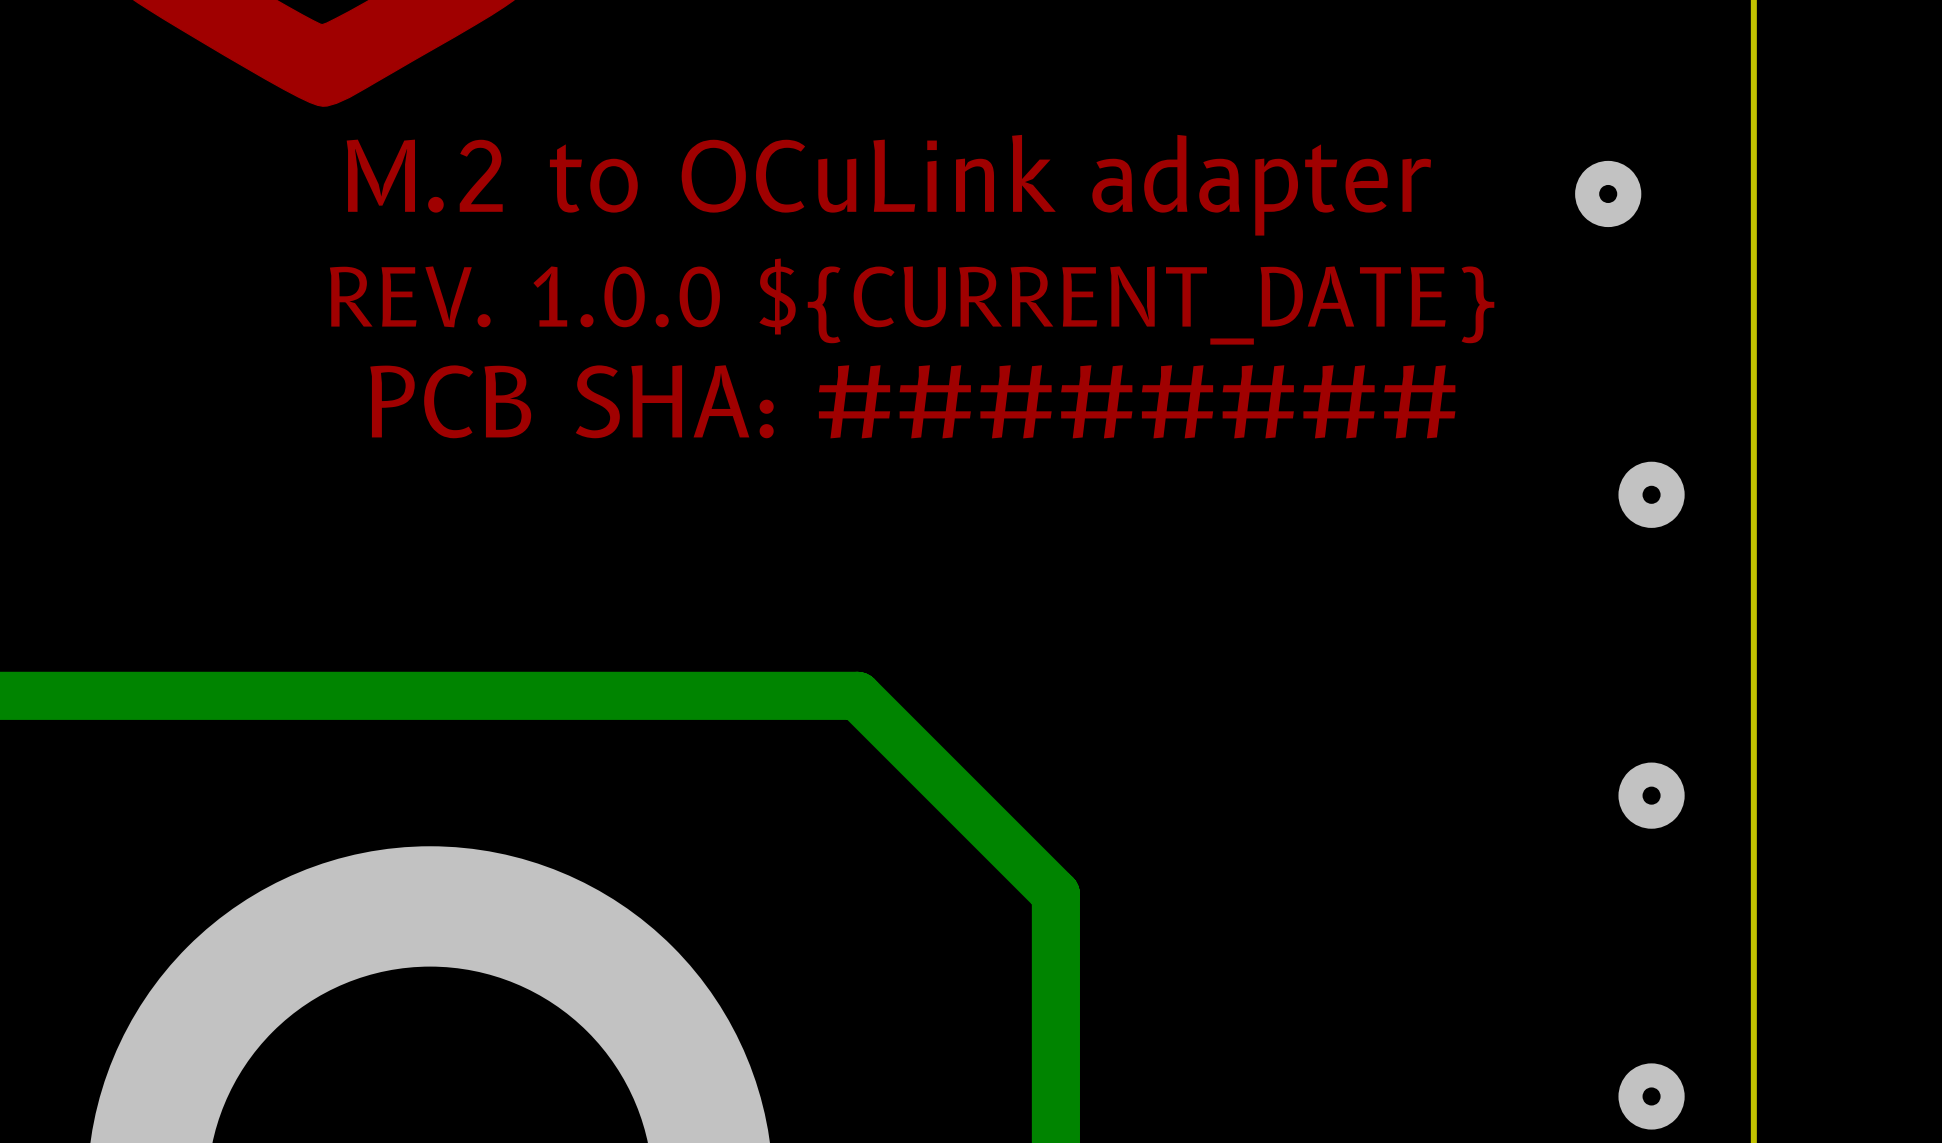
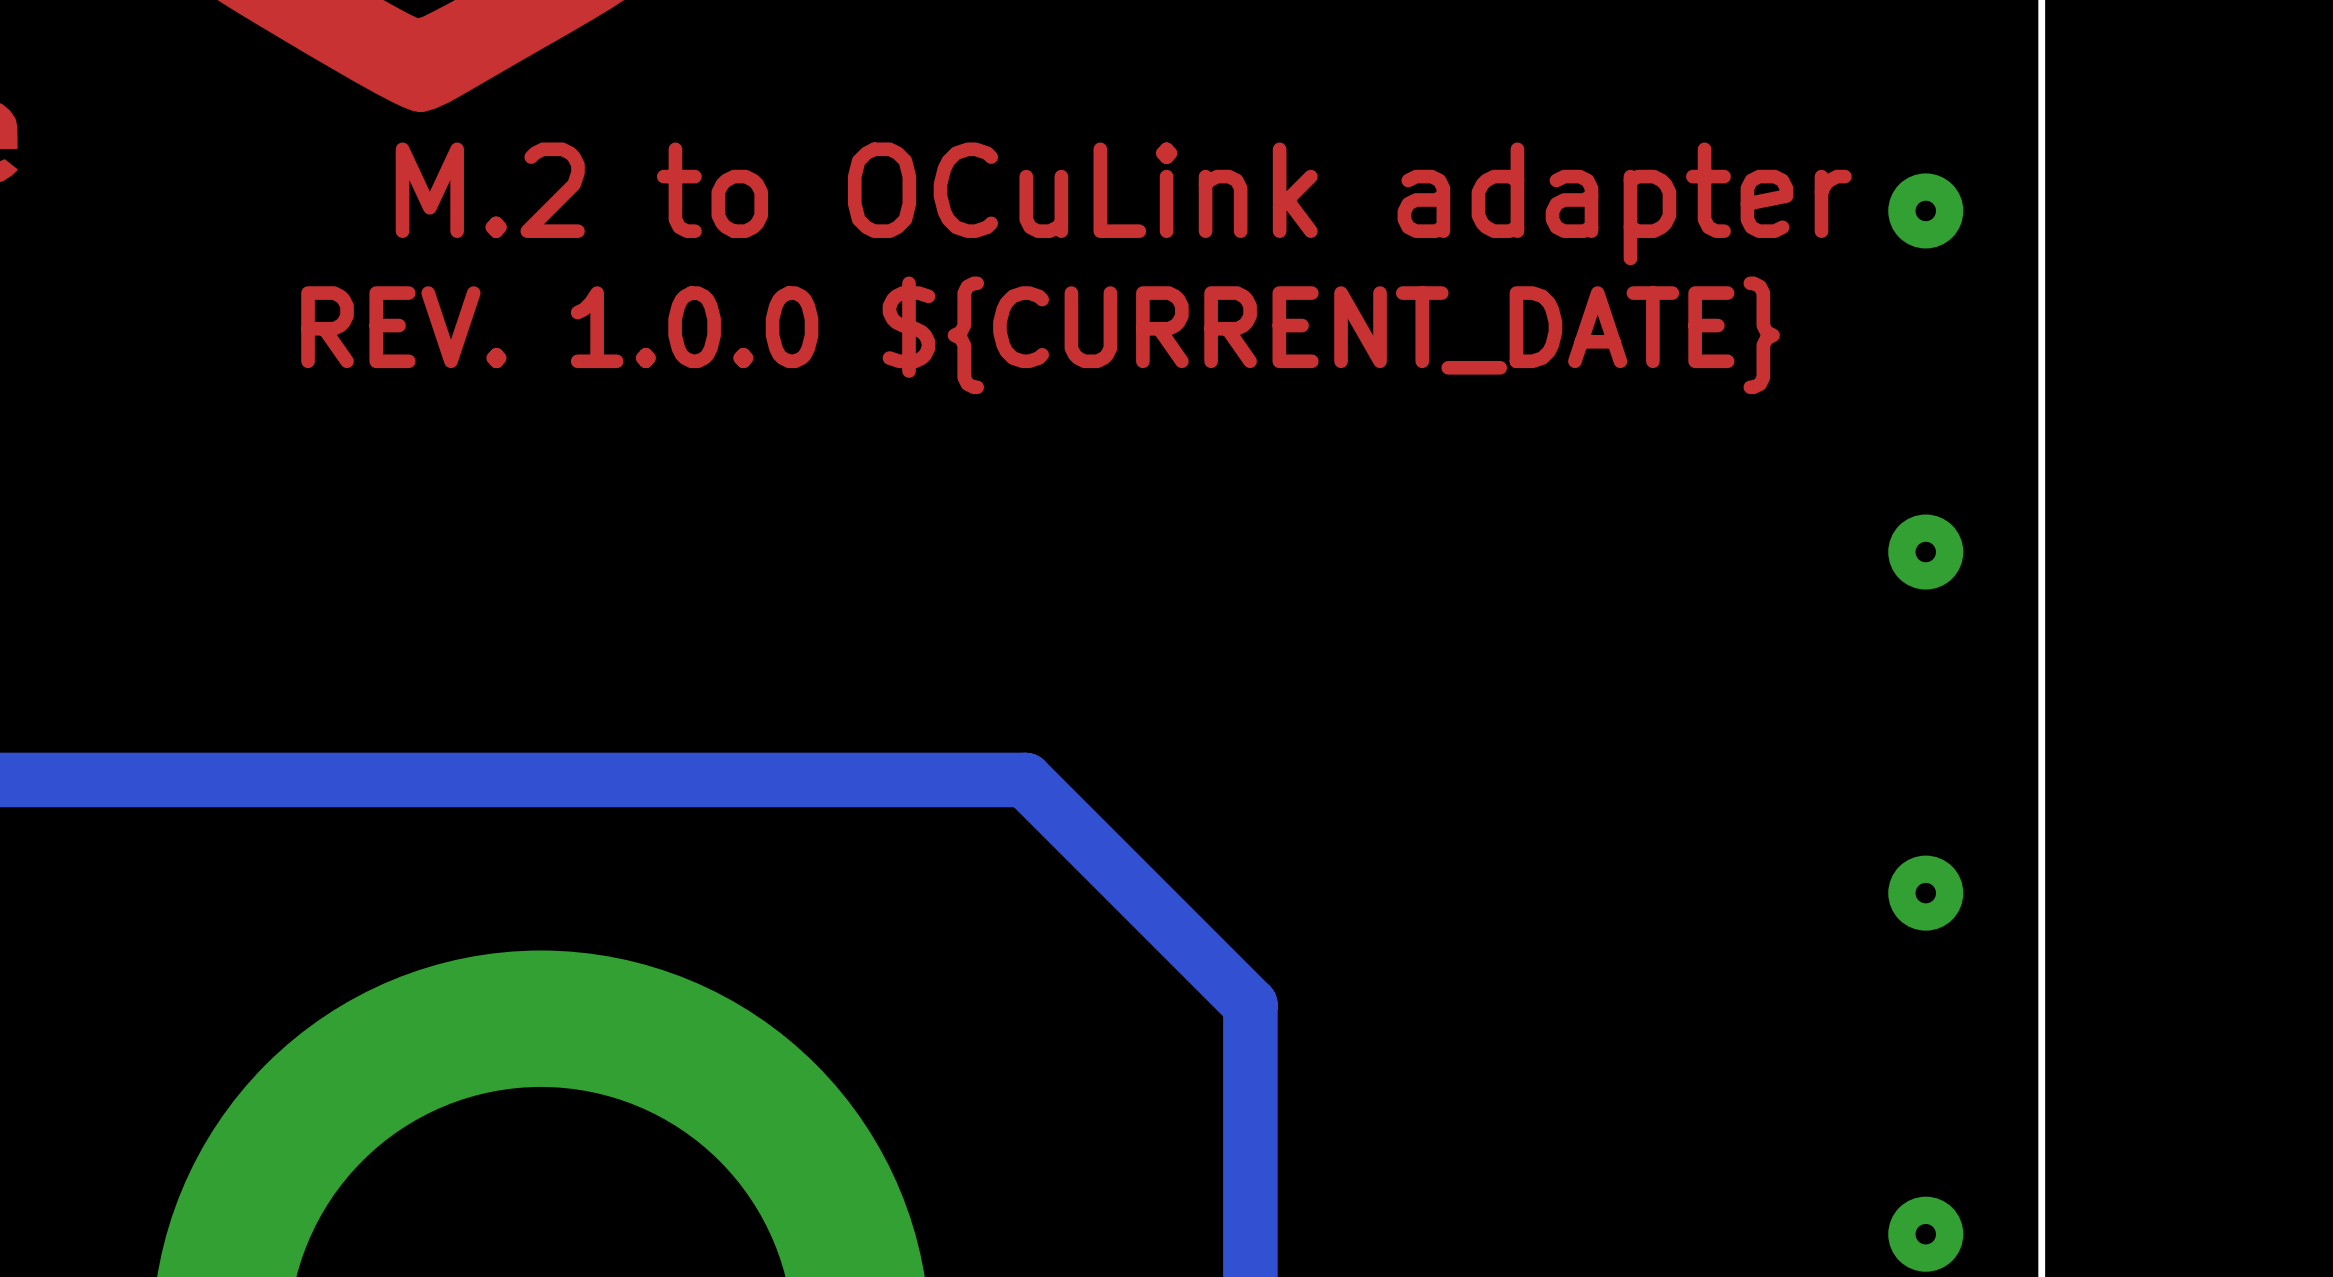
text position: M.2 to OCuLink adapter (888, 185) -> M.2 to OCuLink adapter (1123, 203)
via position: (1608, 193) -> (1925, 210)
text position: REV. 1.0.0 ${CURRENT_DATE} (912, 301) -> REV. 1.0.0 ${CURRENT_DATE} (1040, 335)
text: PCB SHA: ######## (912, 401) -> none

